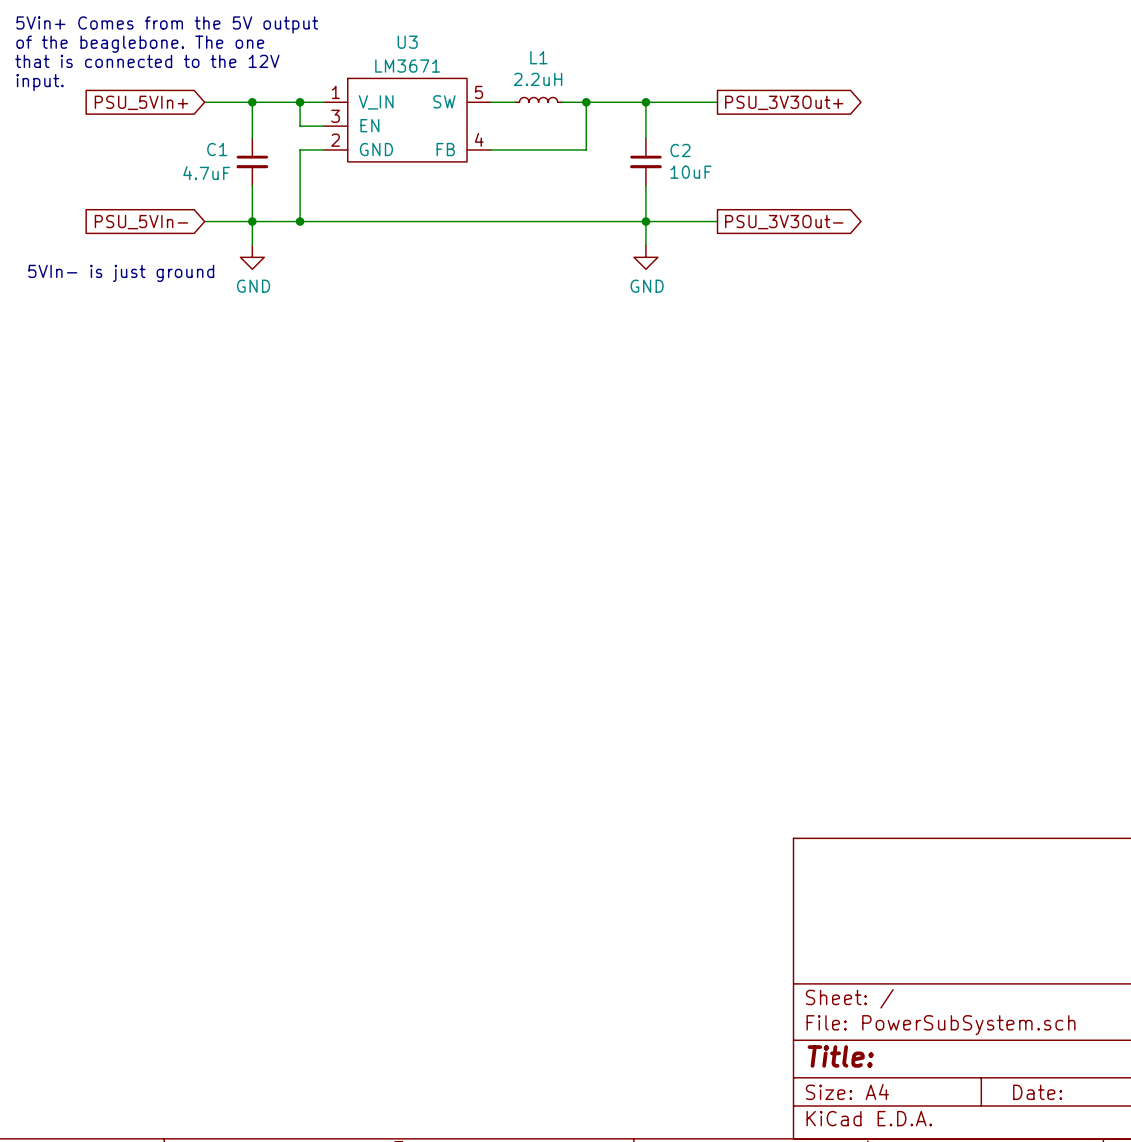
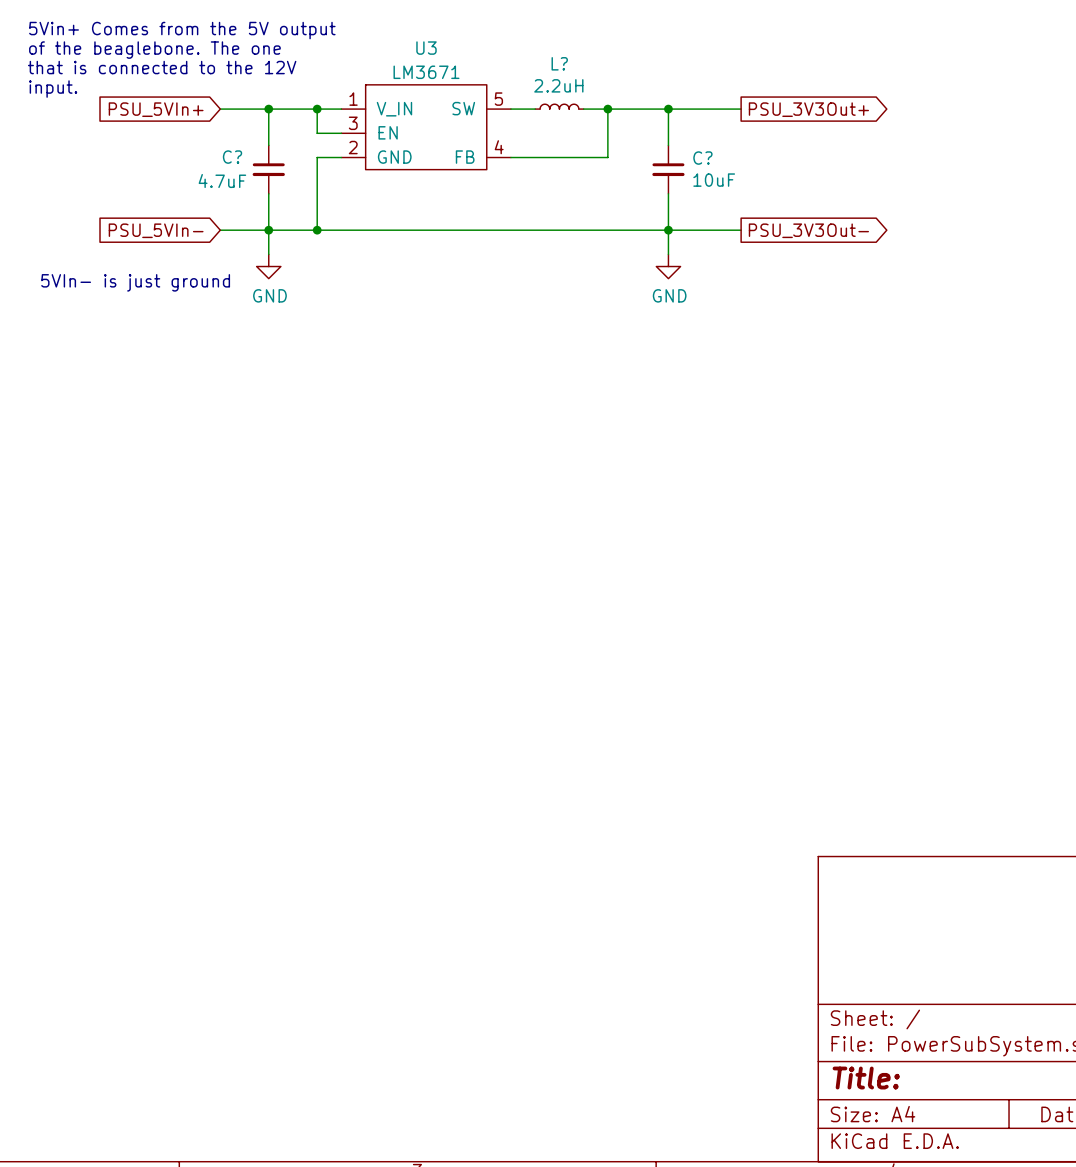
L1 name: L1 (538, 57) -> L? (559, 63)
C1 name: C1 (217, 149) -> C? (232, 157)
C2 name: C2 (680, 150) -> C? (702, 158)

